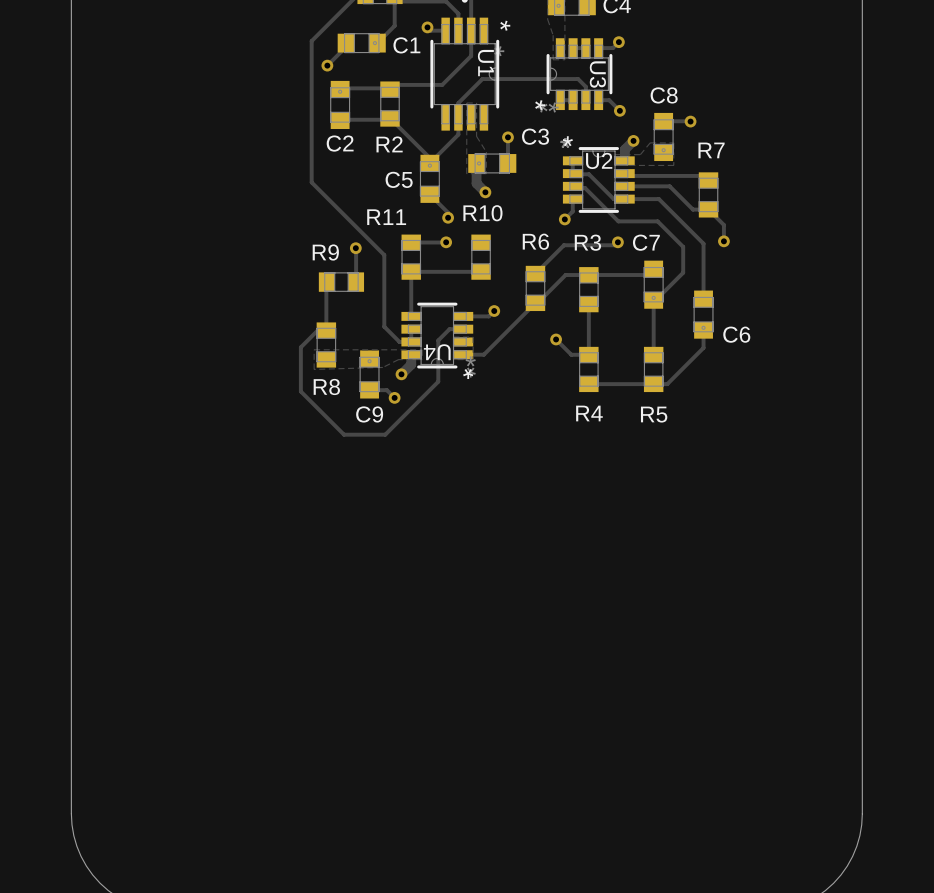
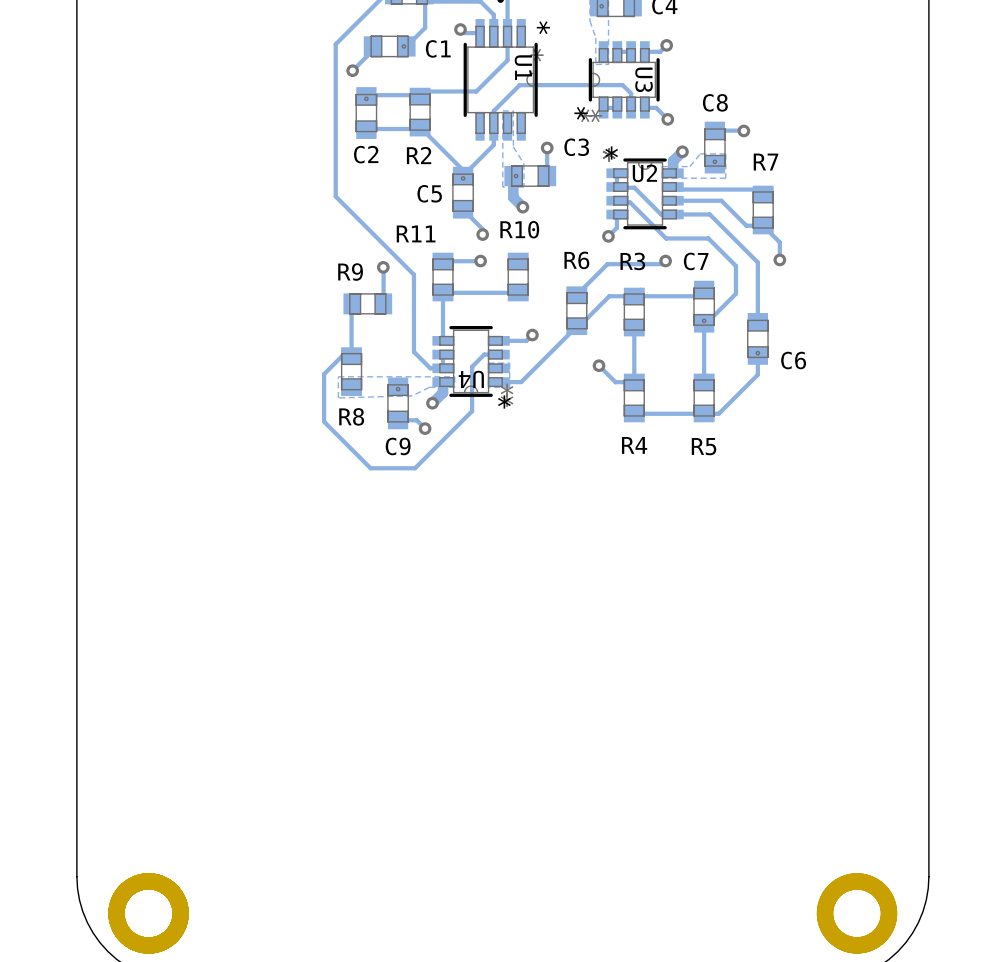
part: none -> (148, 913)
part: none -> (857, 913)

